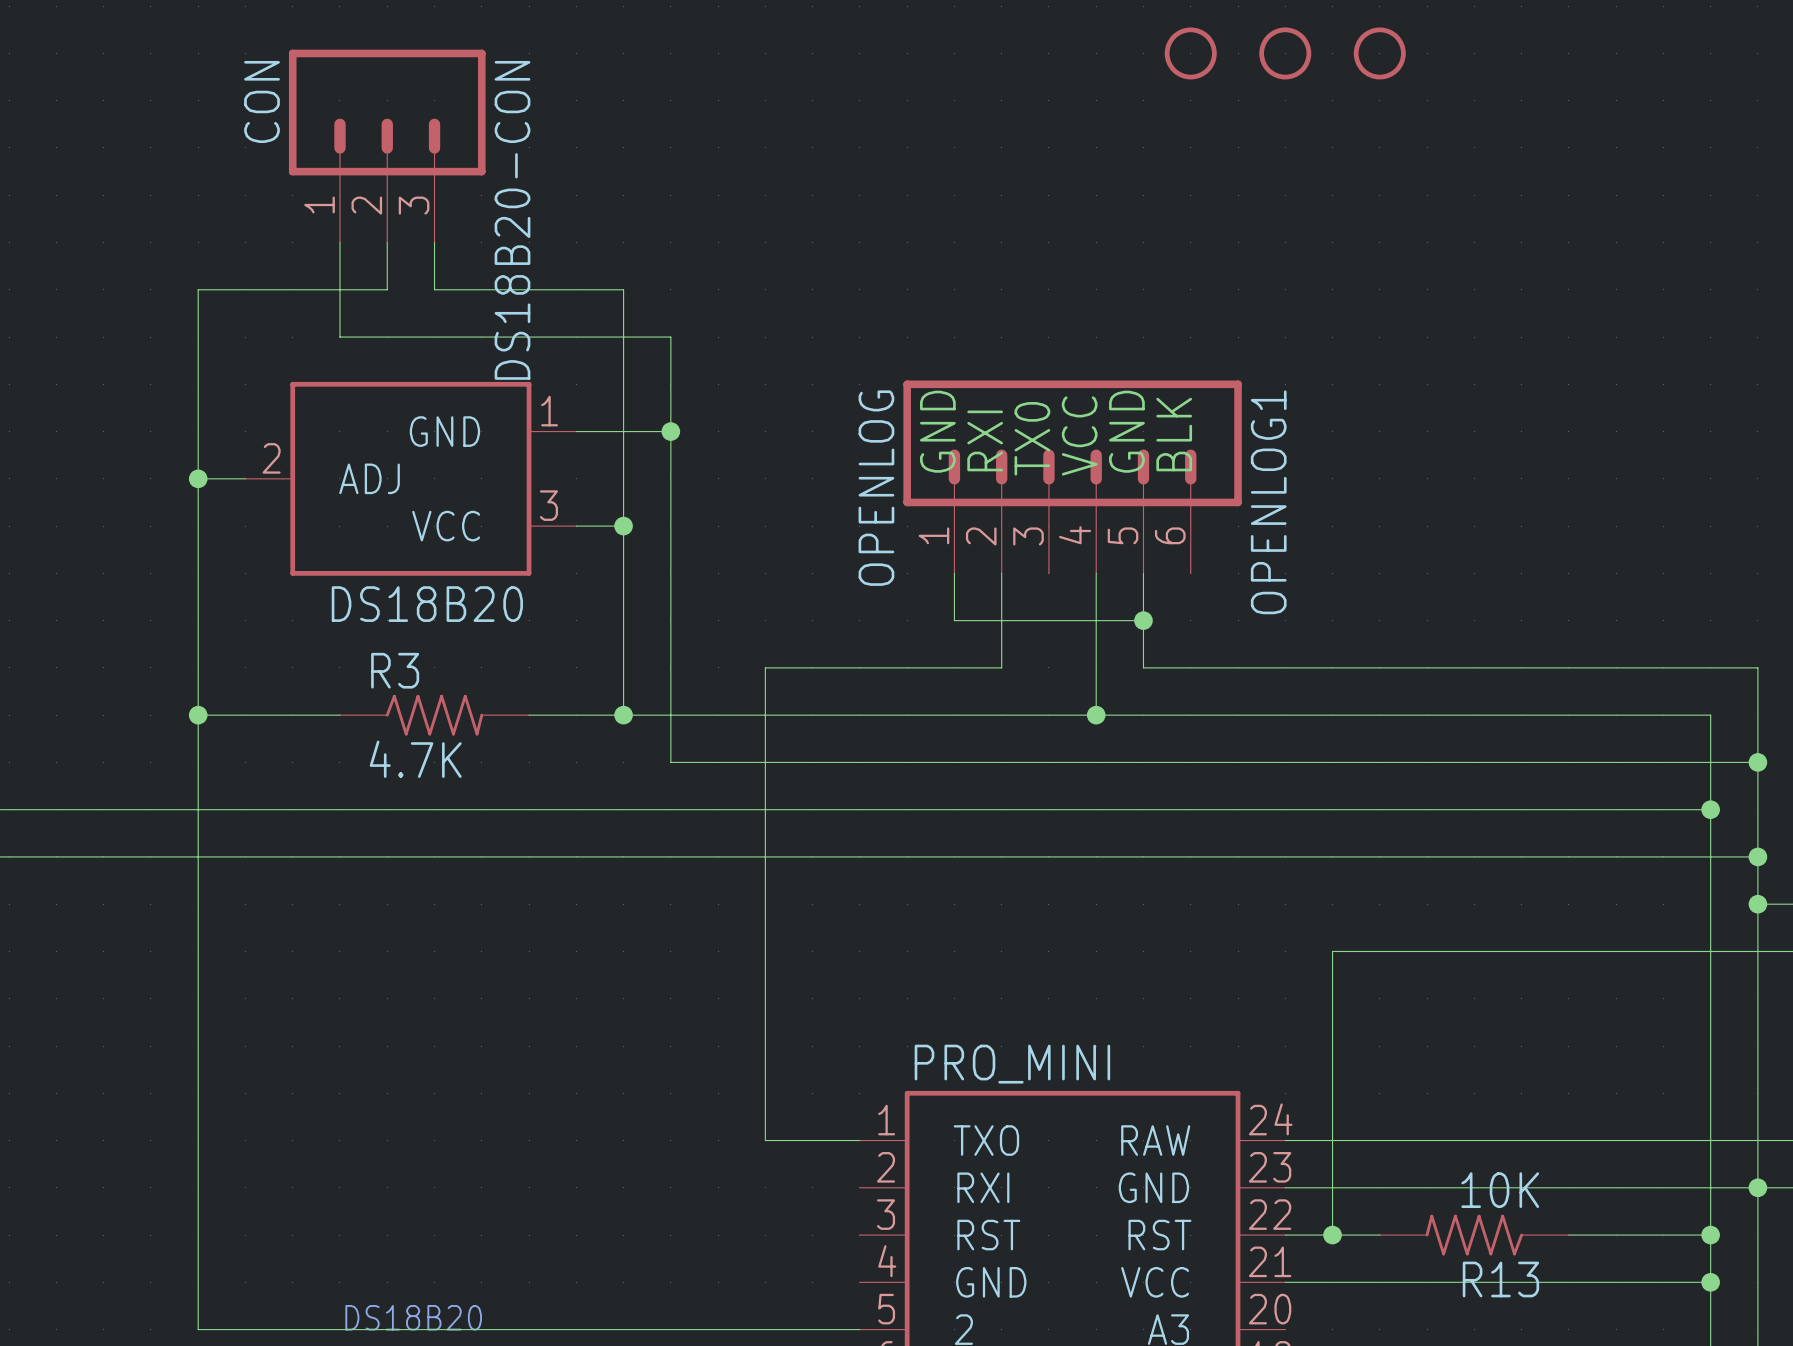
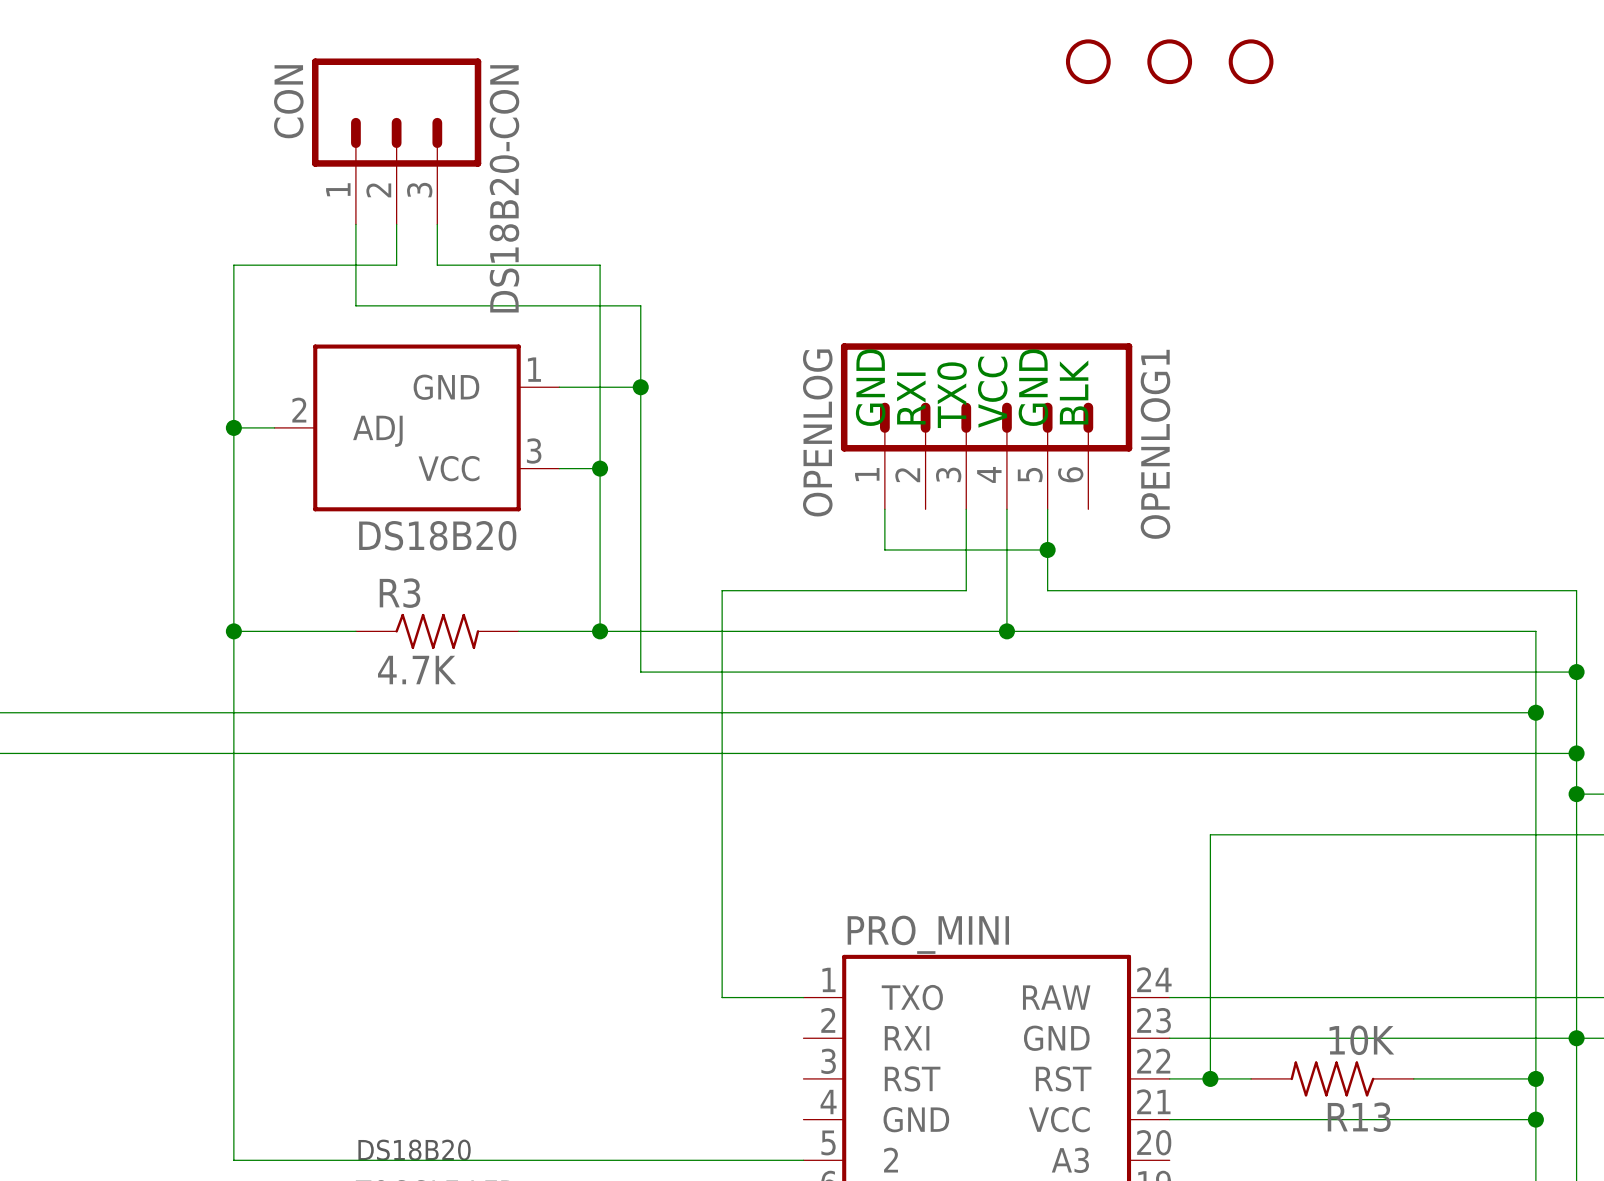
wire: (1001, 573) (1001, 667) -> (966, 509) (966, 590) (925, 590)

